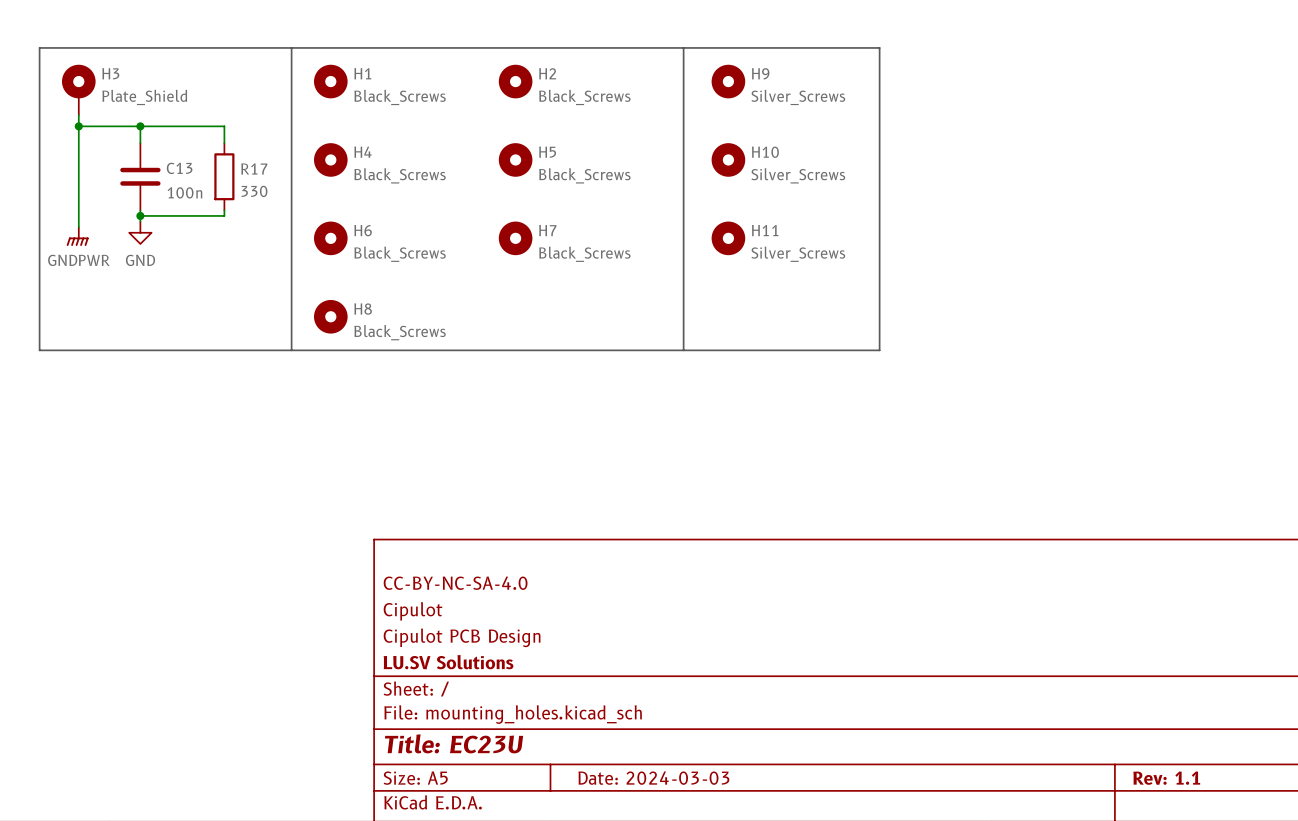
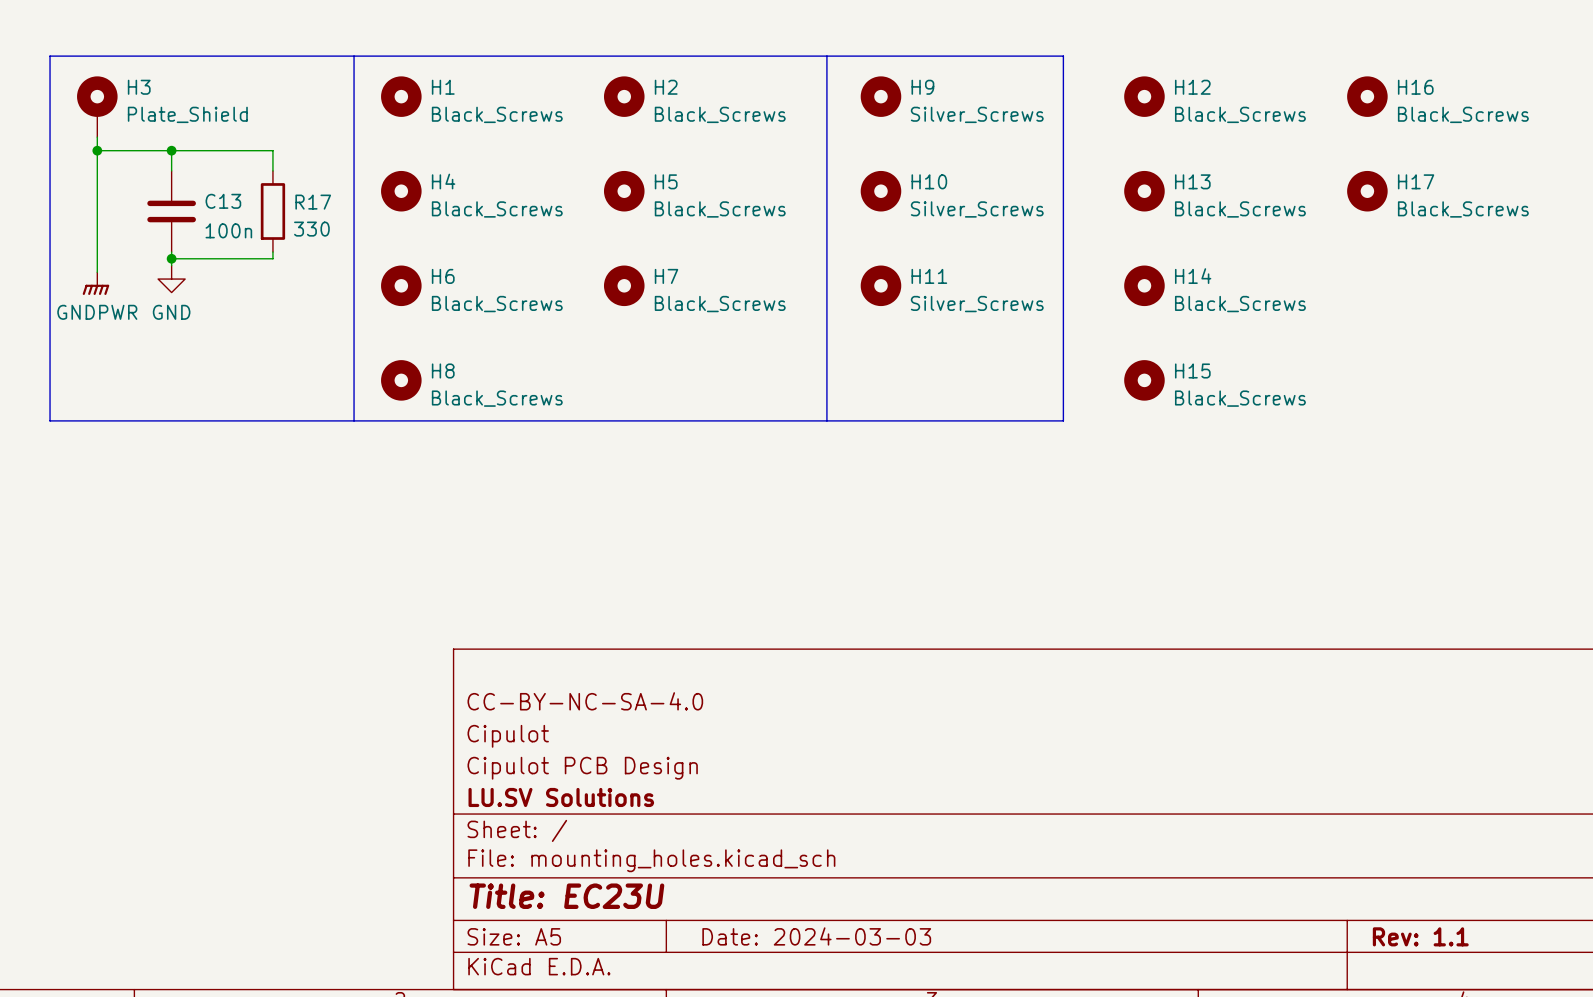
H12: none -> Black_Screws (1144, 96)
H16: none -> Black_Screws (1367, 96)
H13: none -> Black_Screws (1144, 191)
H17: none -> Black_Screws (1367, 191)
H14: none -> Black_Screws (1144, 285)
H15: none -> Black_Screws (1144, 380)

